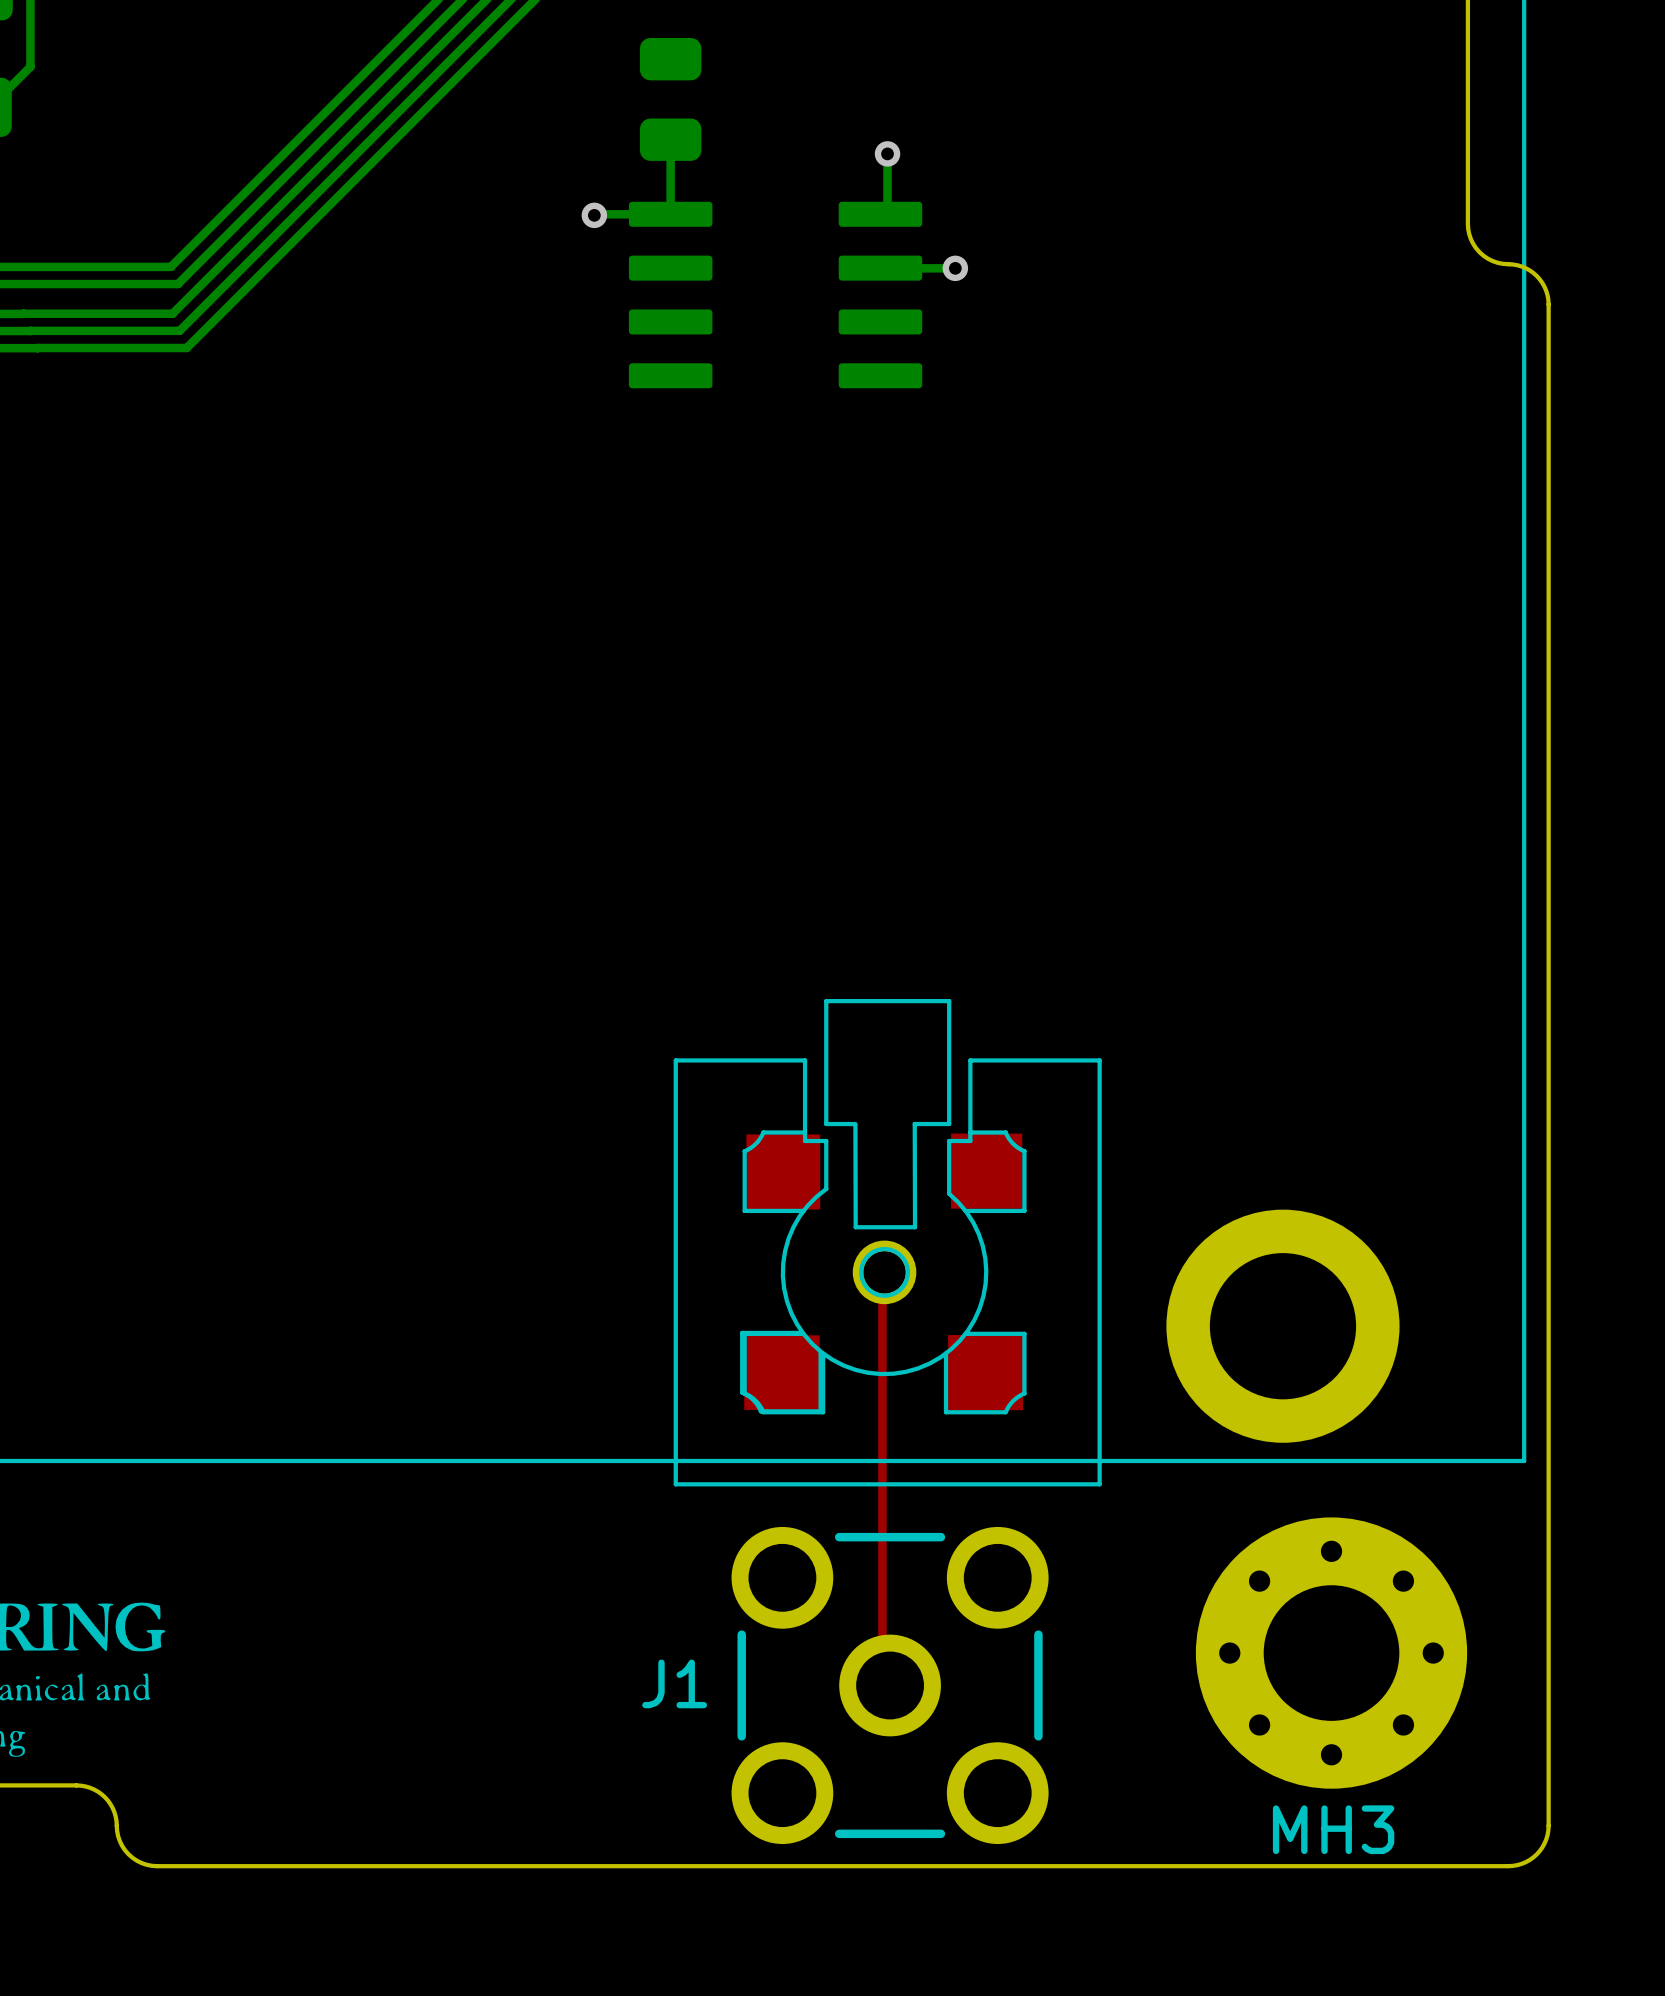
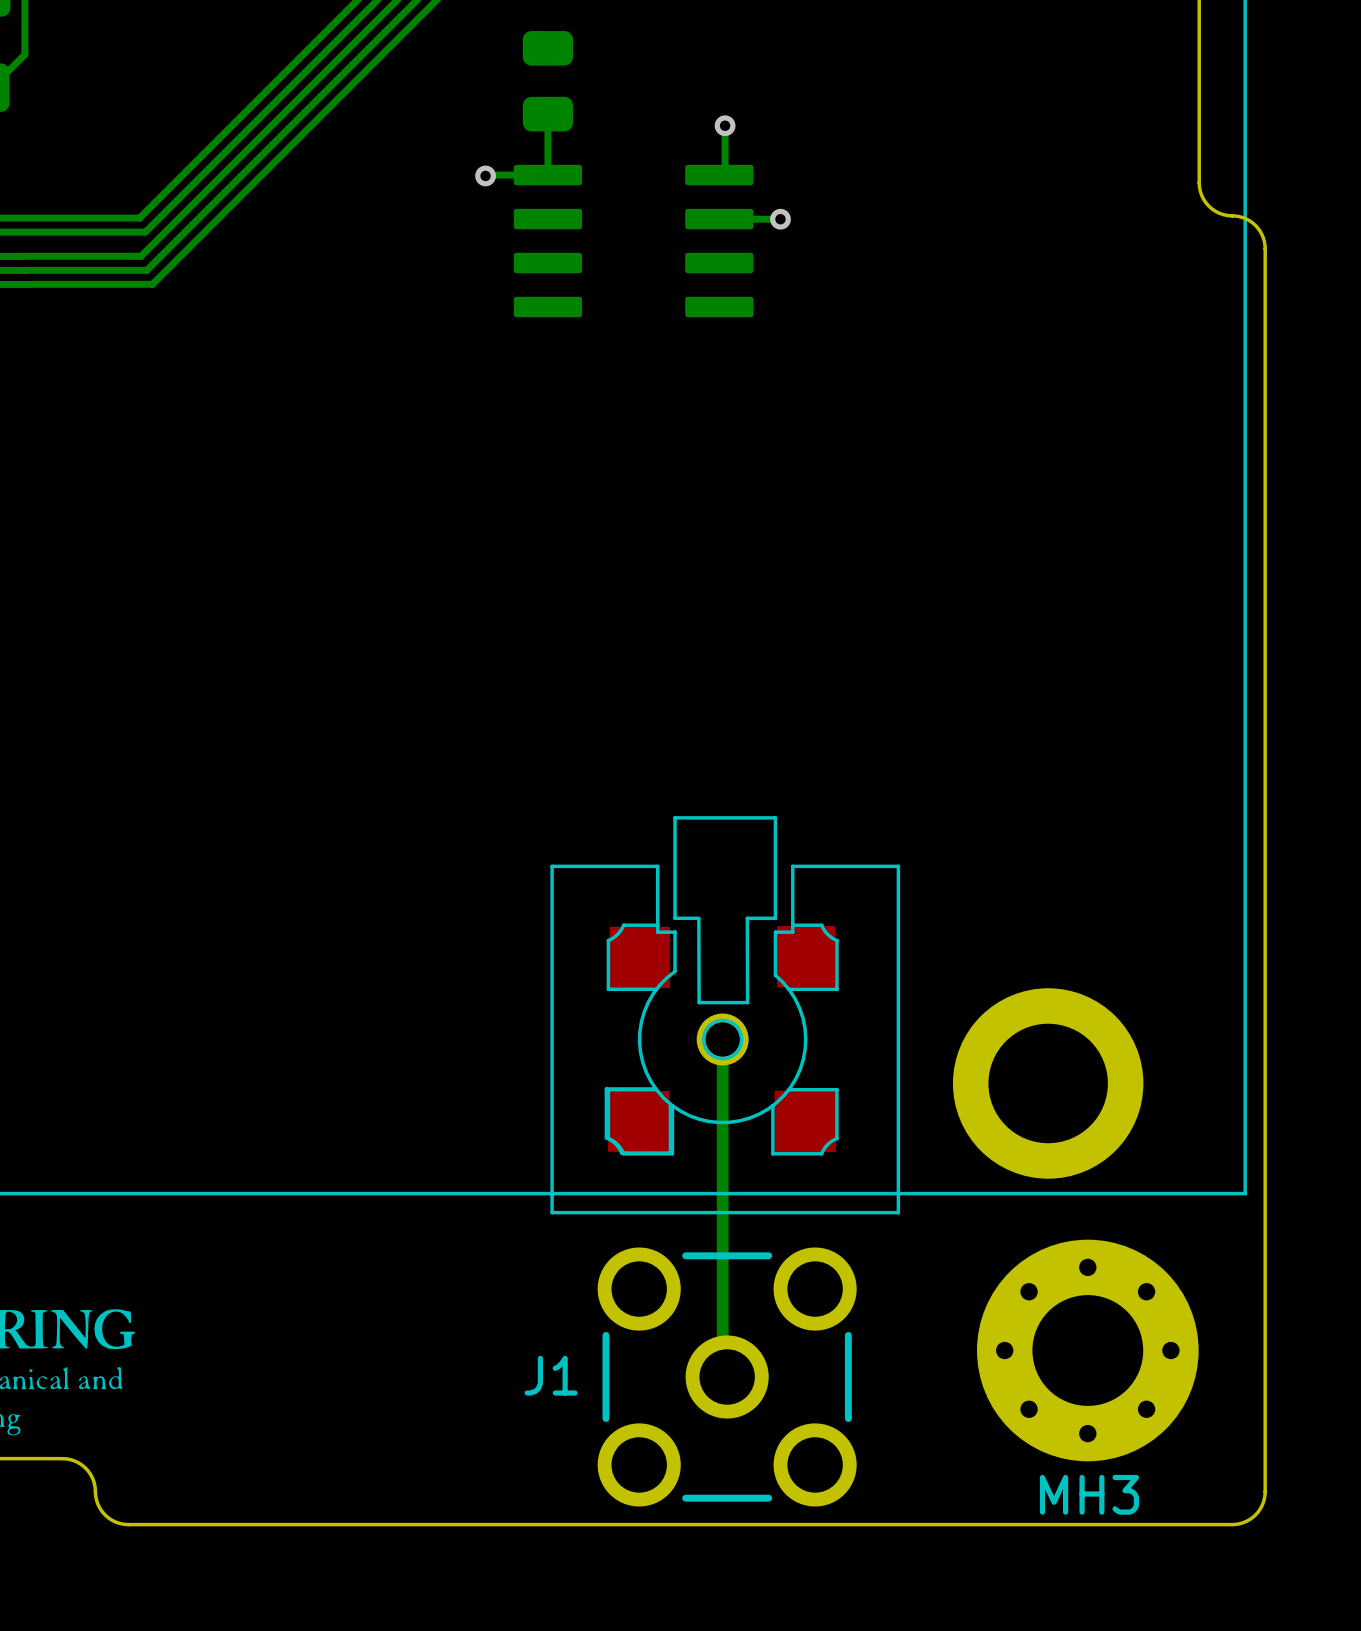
top track: (882, 1272) (882, 1677) -> none
bottom track: none -> (722, 1039) (722, 1377)

